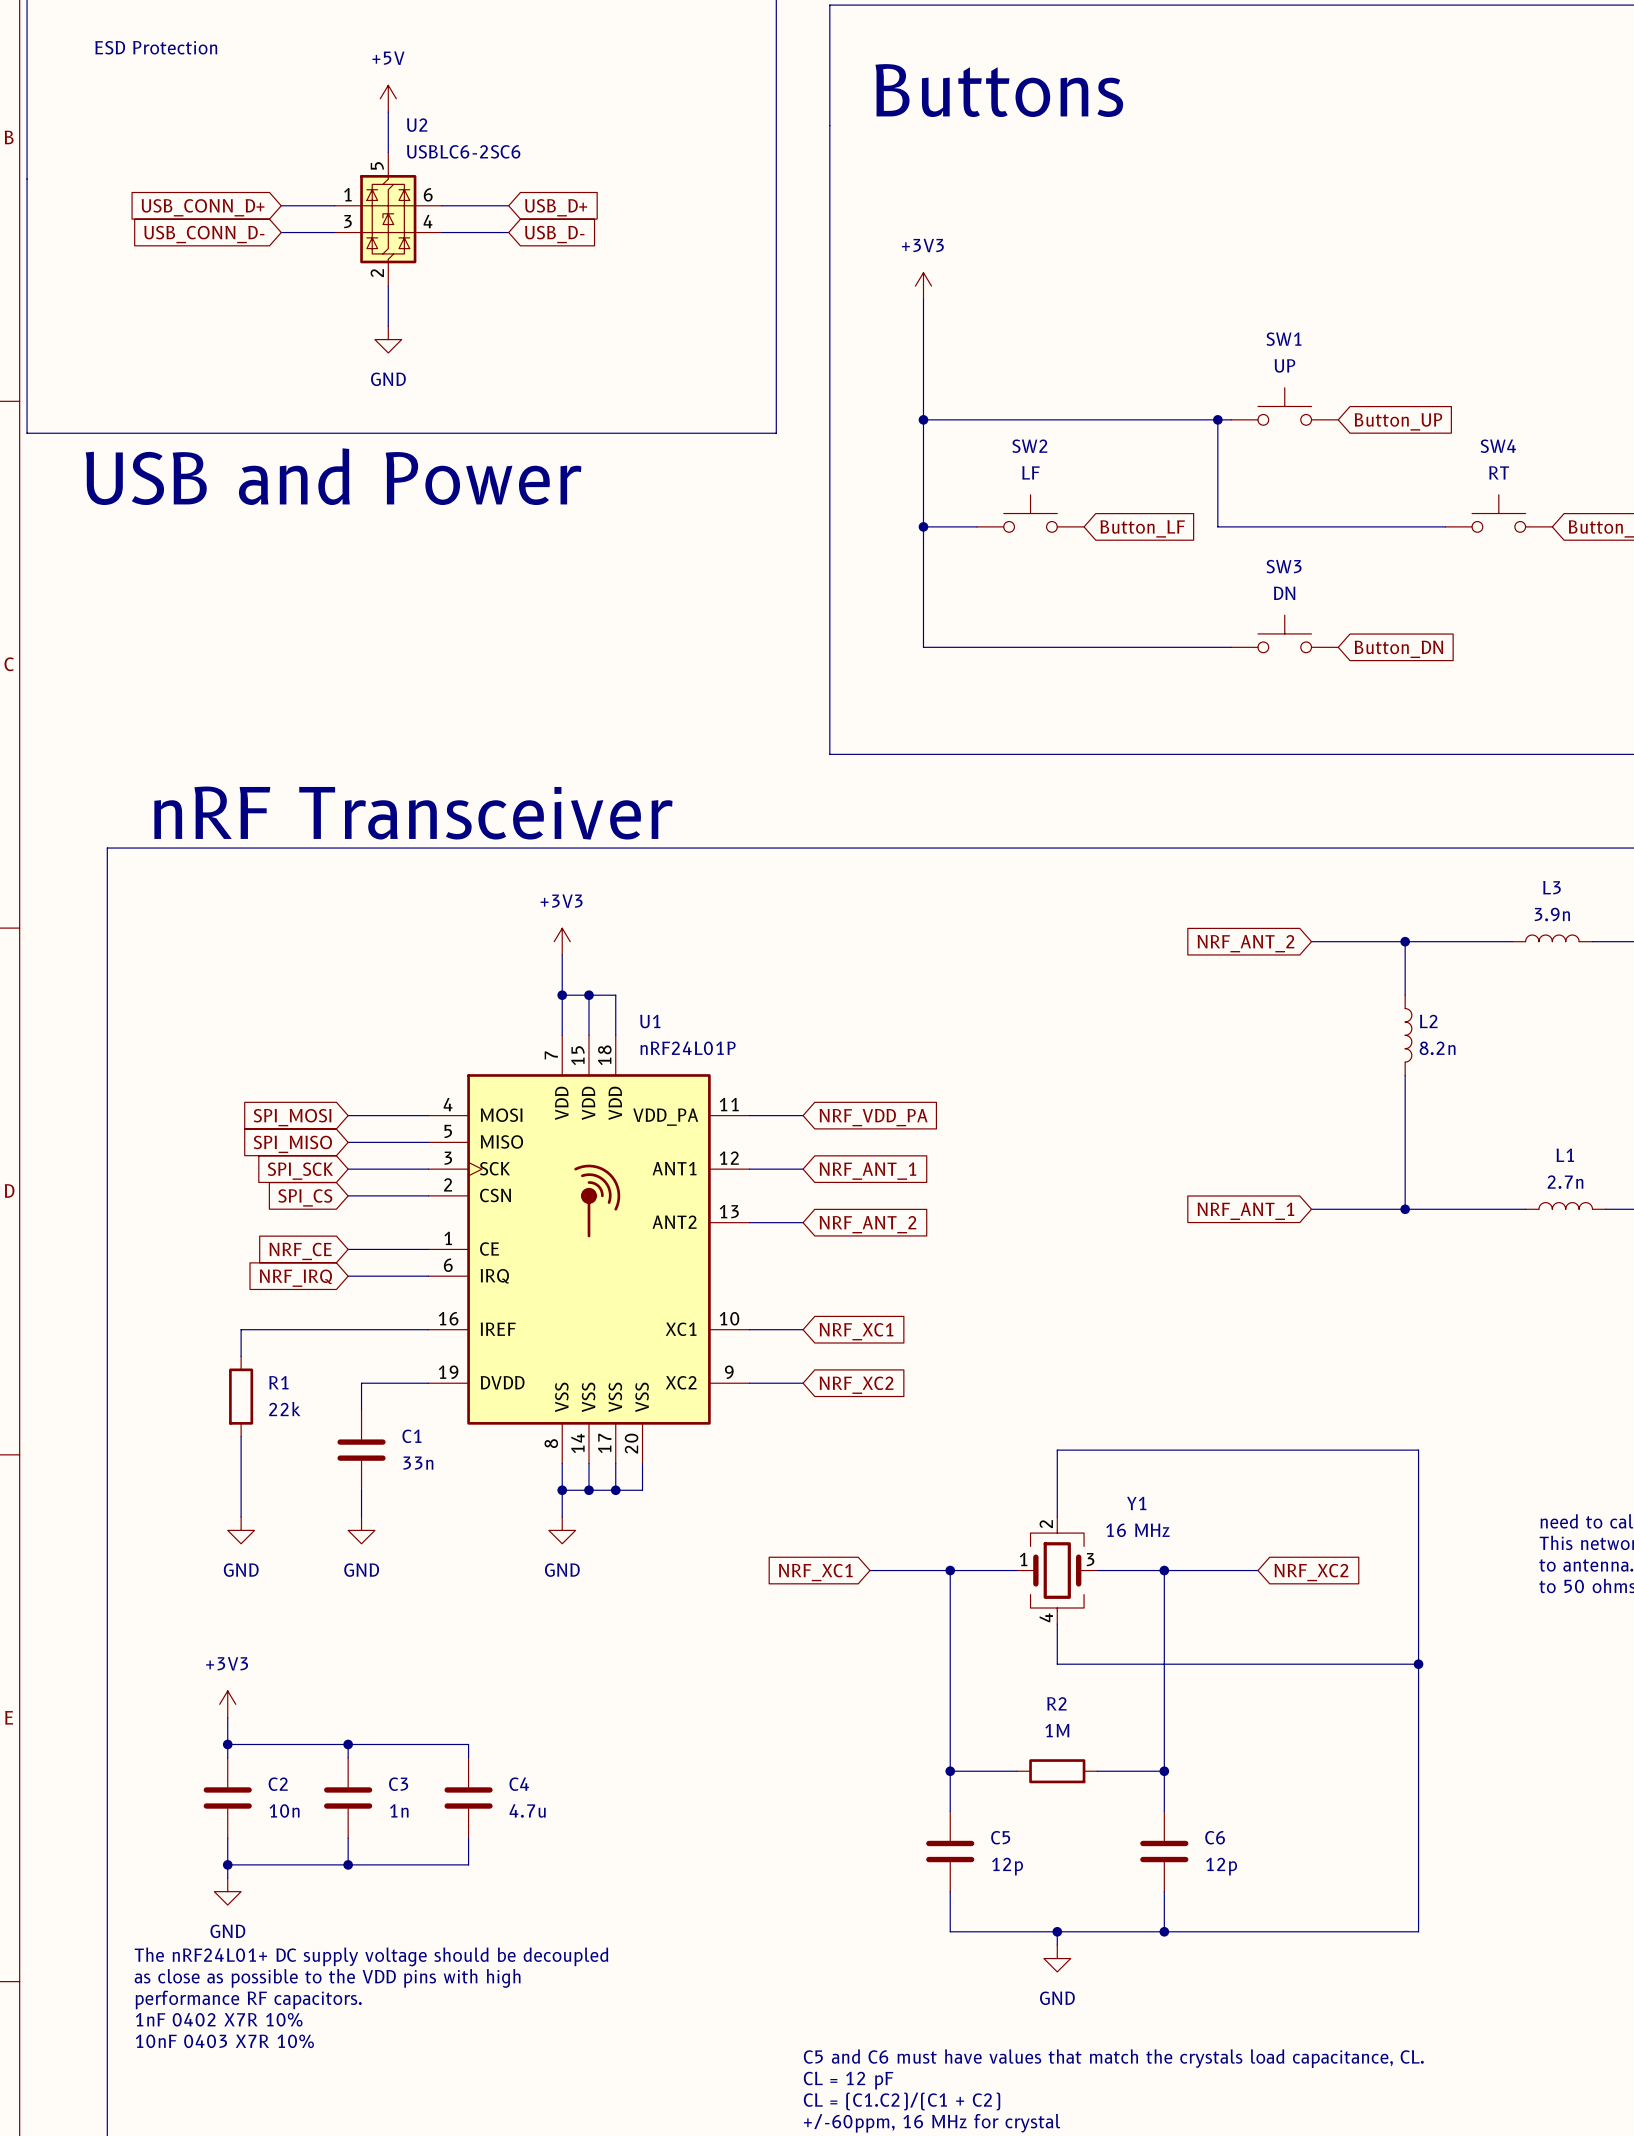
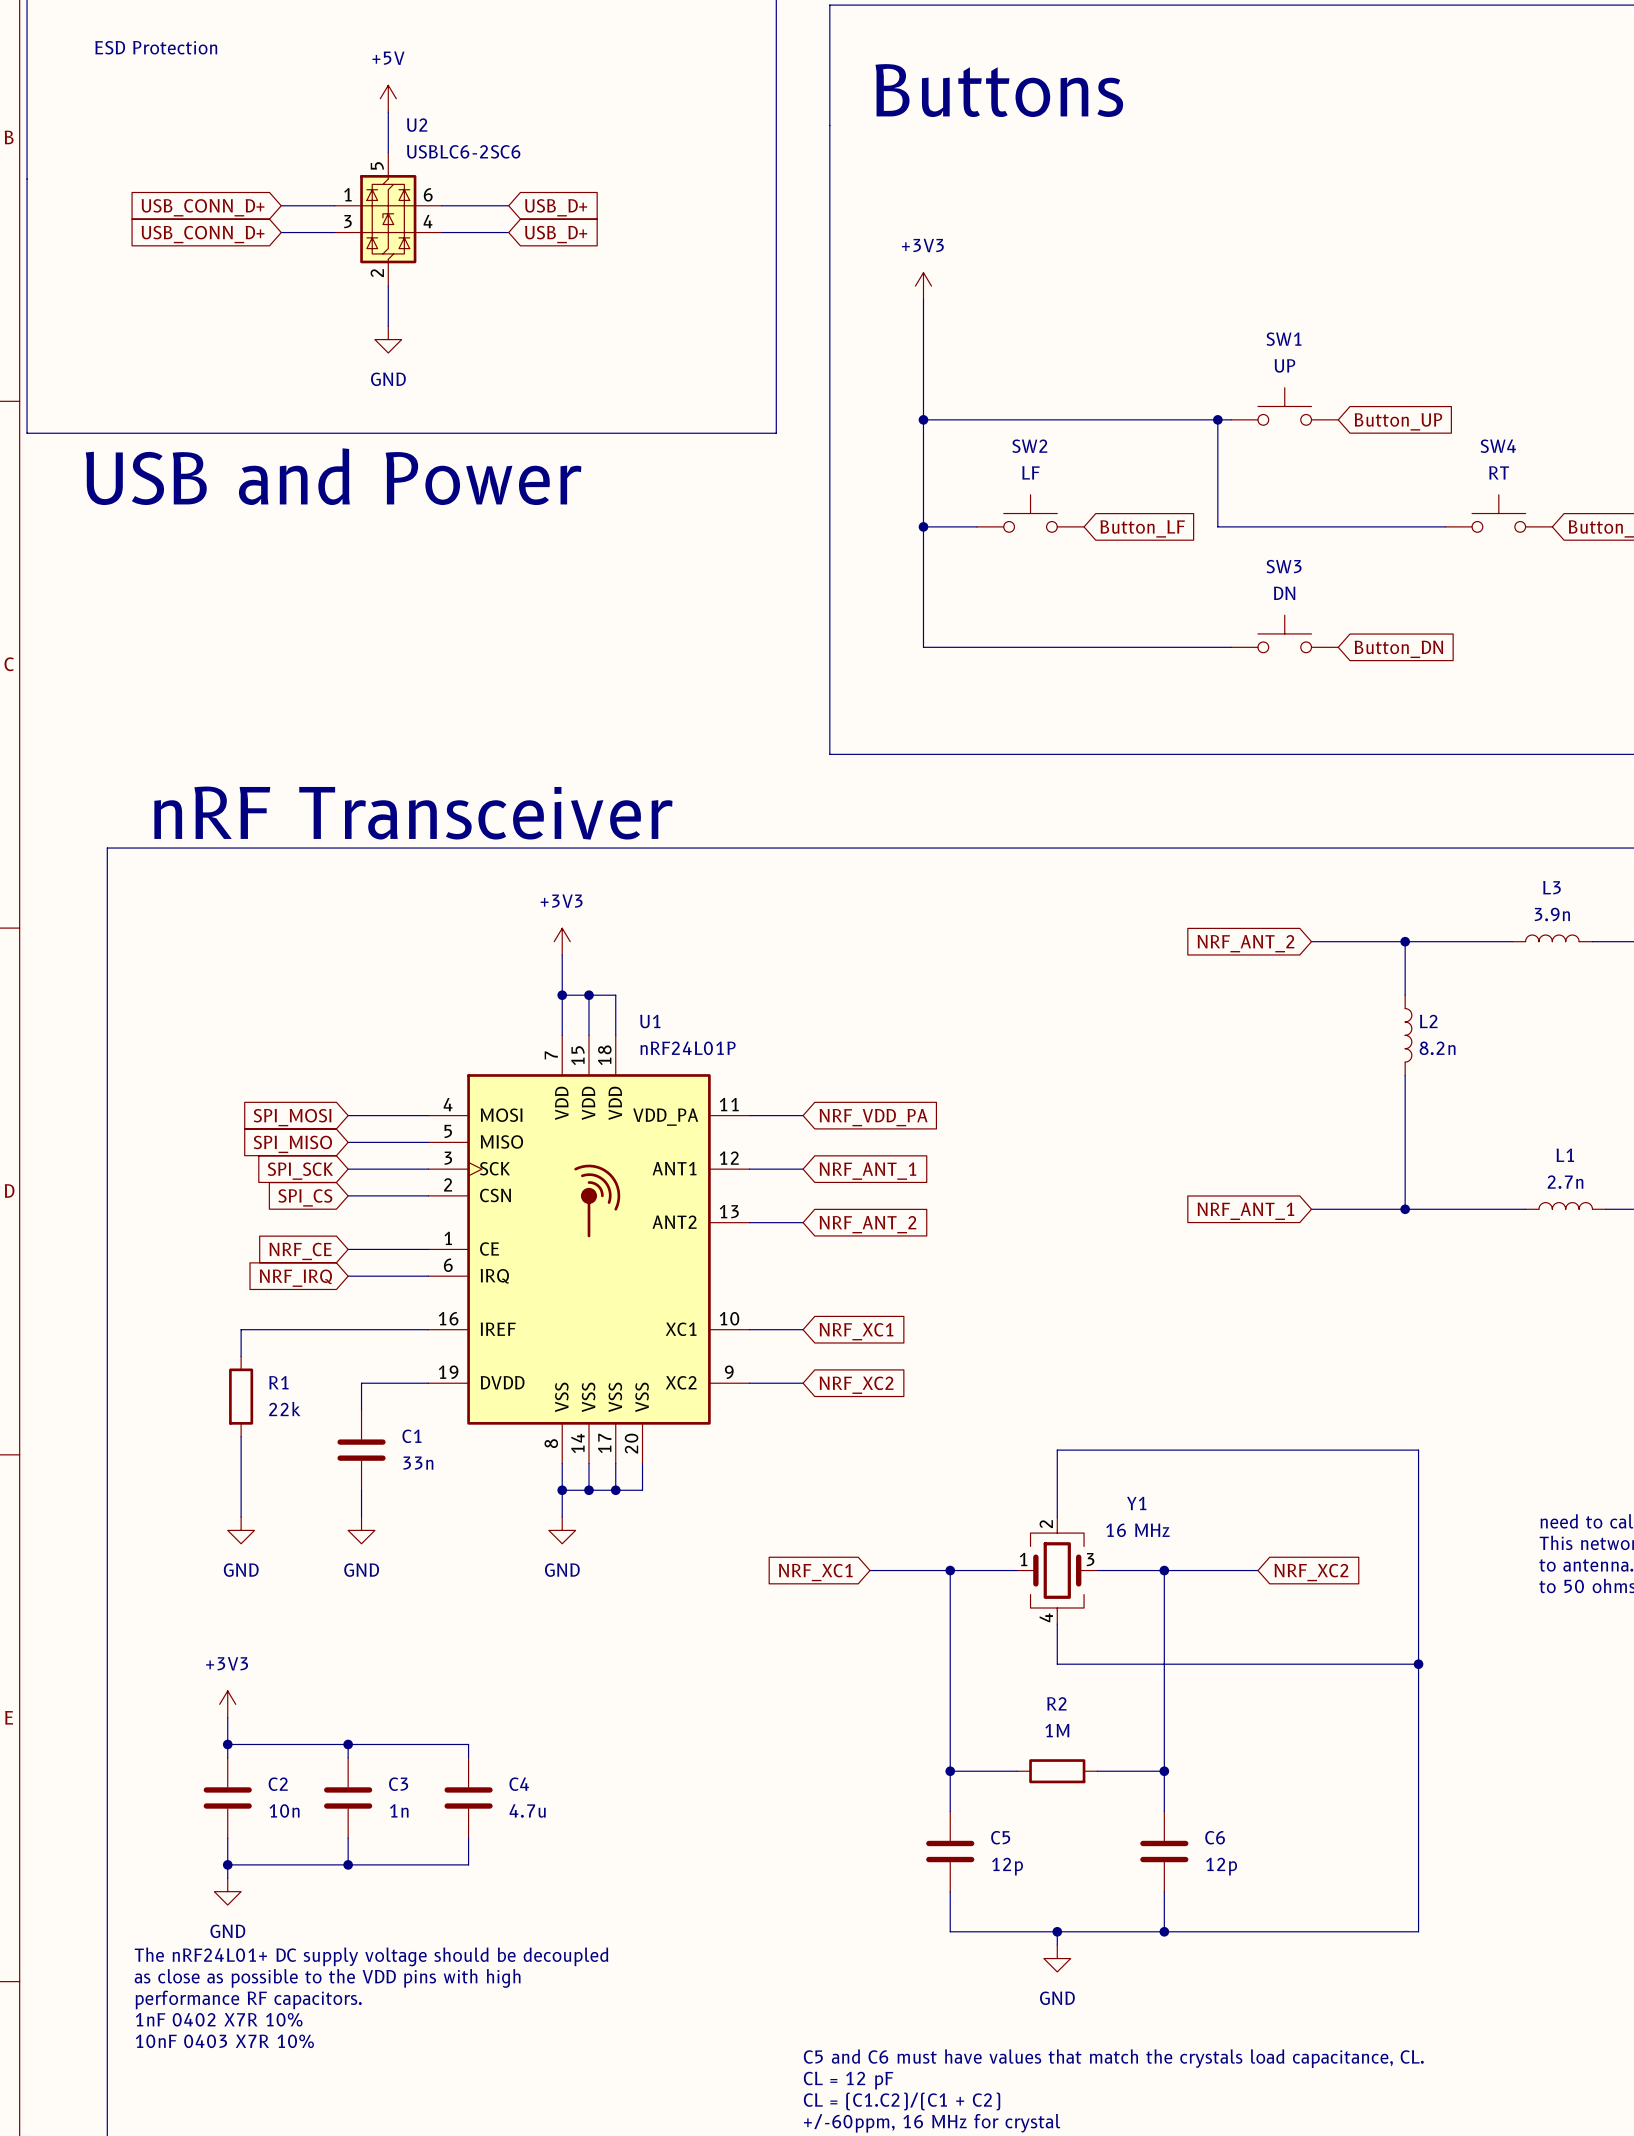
global label: USB_CONN_D- (204, 234) -> USB_CONN_D+ (203, 234)
global label: USB_D- (554, 234) -> USB_D+ (556, 234)

